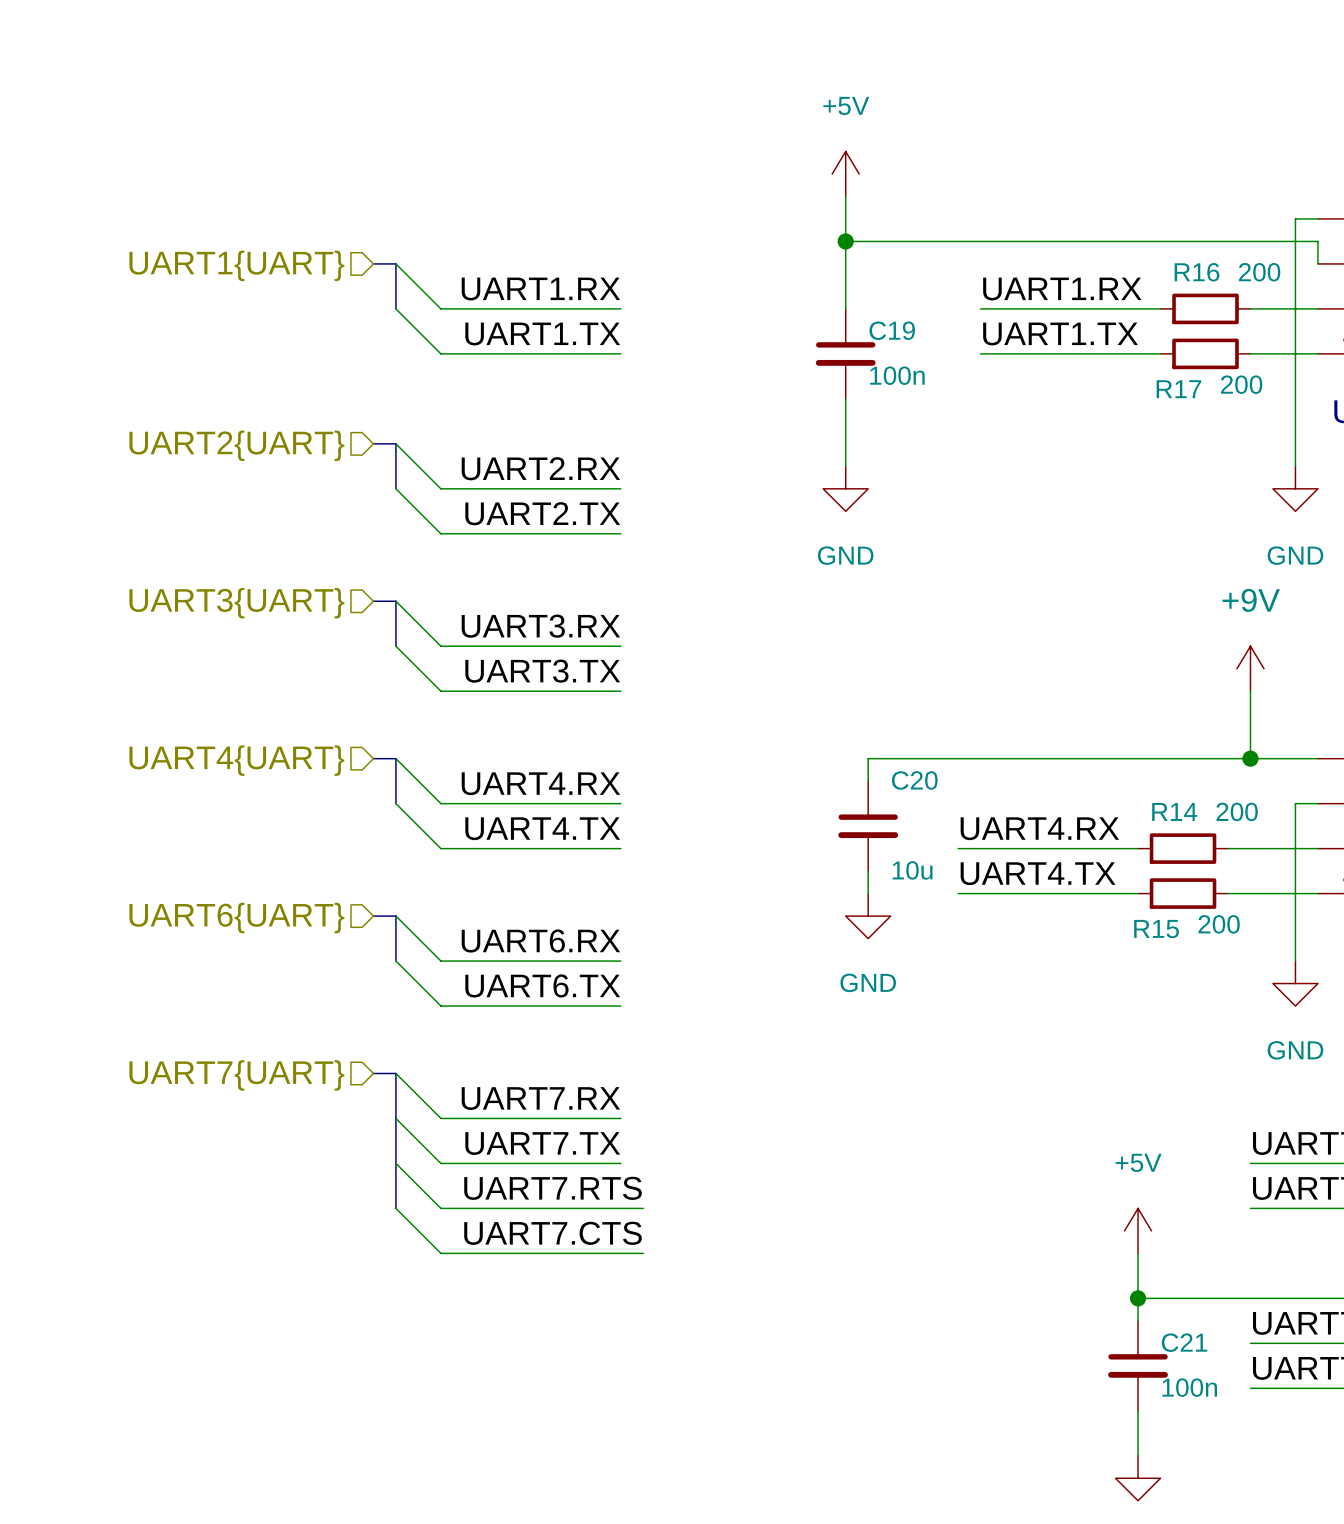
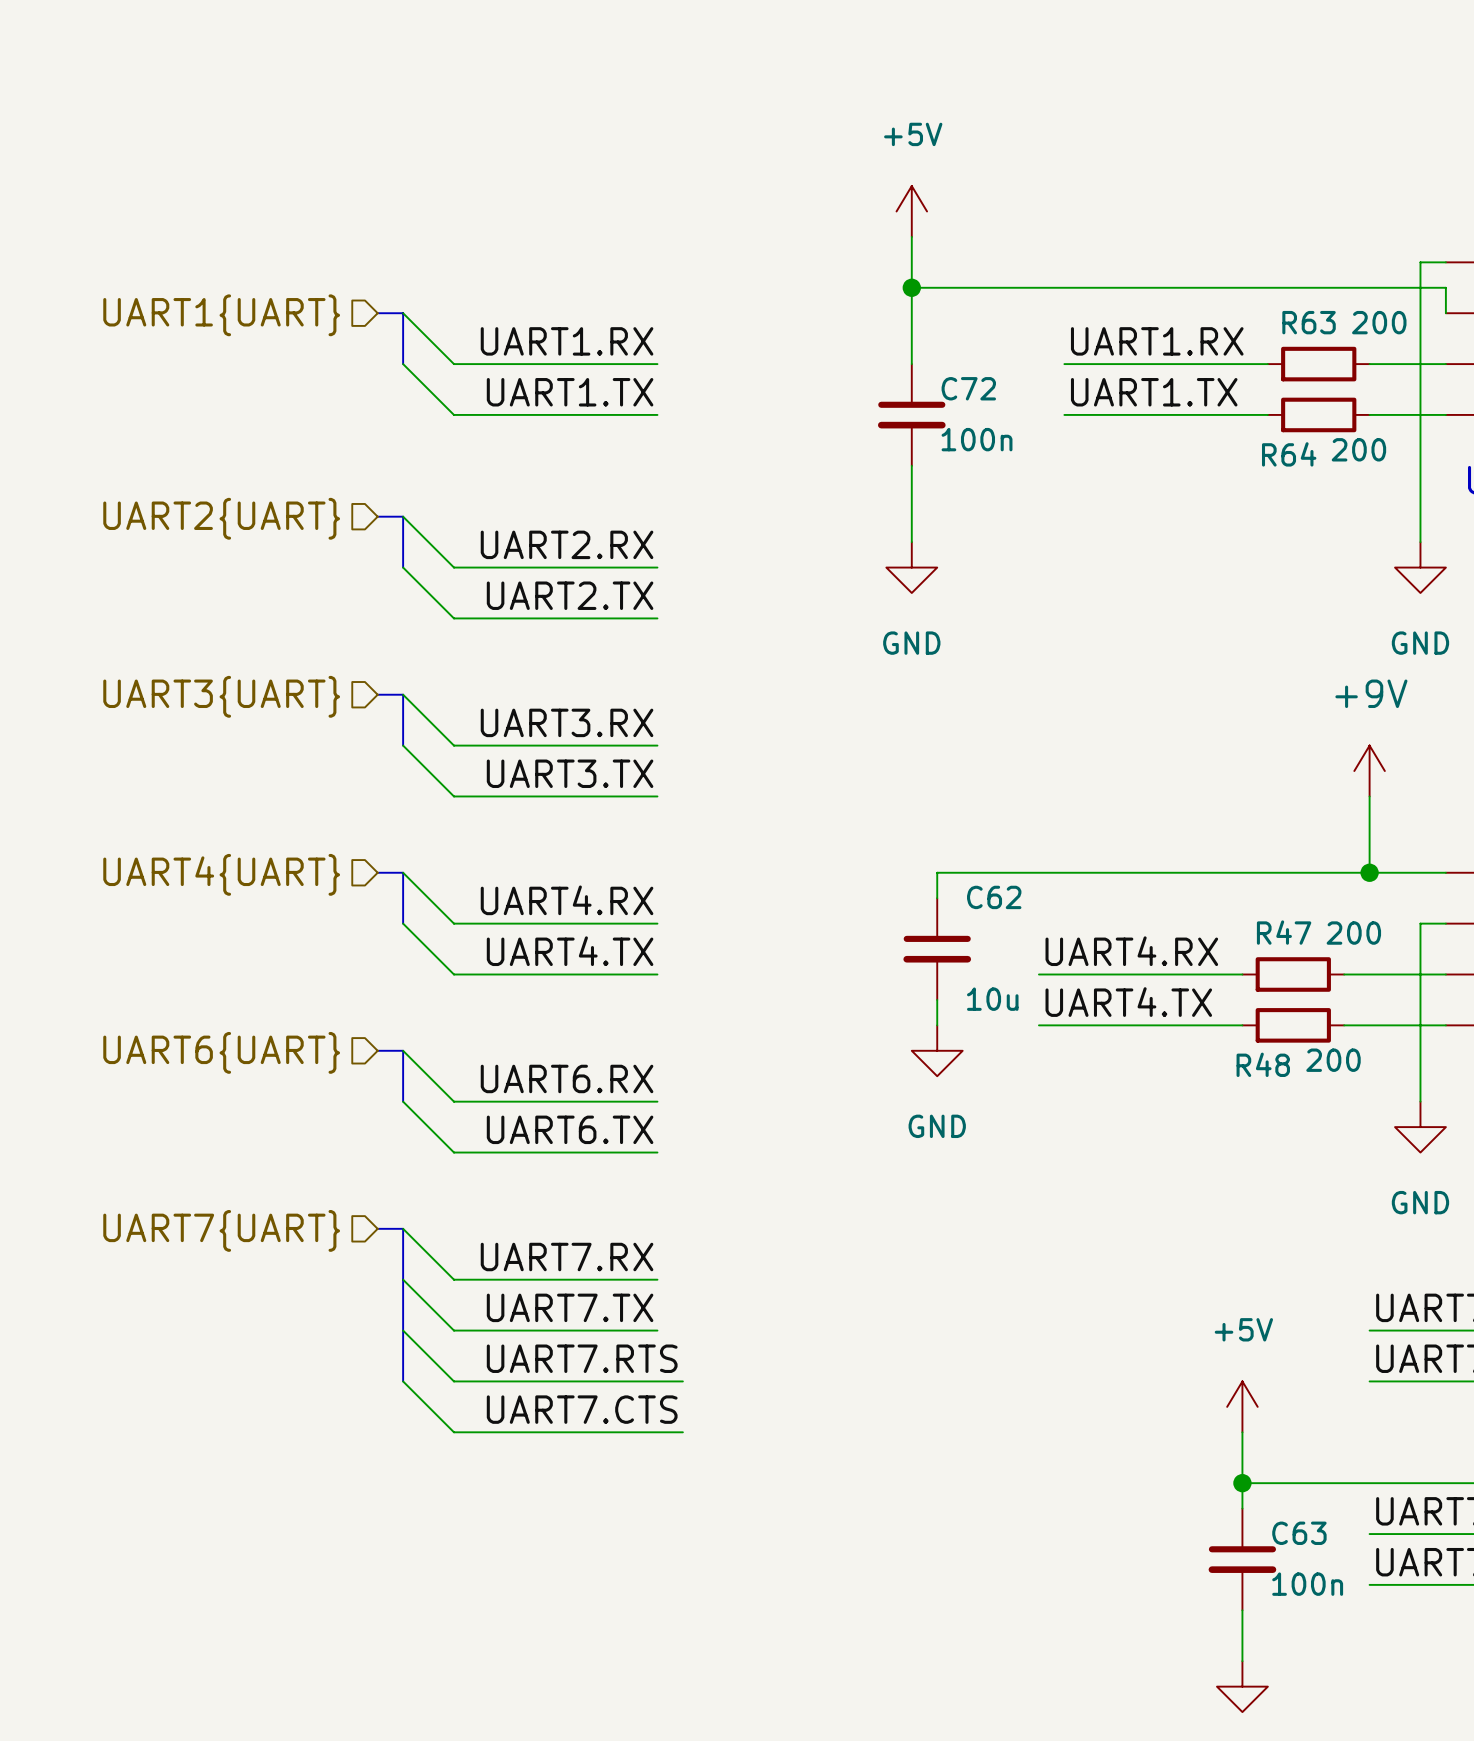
R16 name: R16 (1197, 272) -> R63 (1309, 322)
C19 name: C19 (892, 330) -> C72 (968, 388)
R17 name: R17 (1178, 389) -> R64 (1289, 454)
C20 name: C20 (914, 780) -> C62 (994, 897)
R14 name: R14 (1174, 811) -> R47 (1284, 932)
R15 name: R15 (1156, 929) -> R48 (1263, 1064)
C21 name: C21 (1184, 1342) -> C63 (1299, 1533)

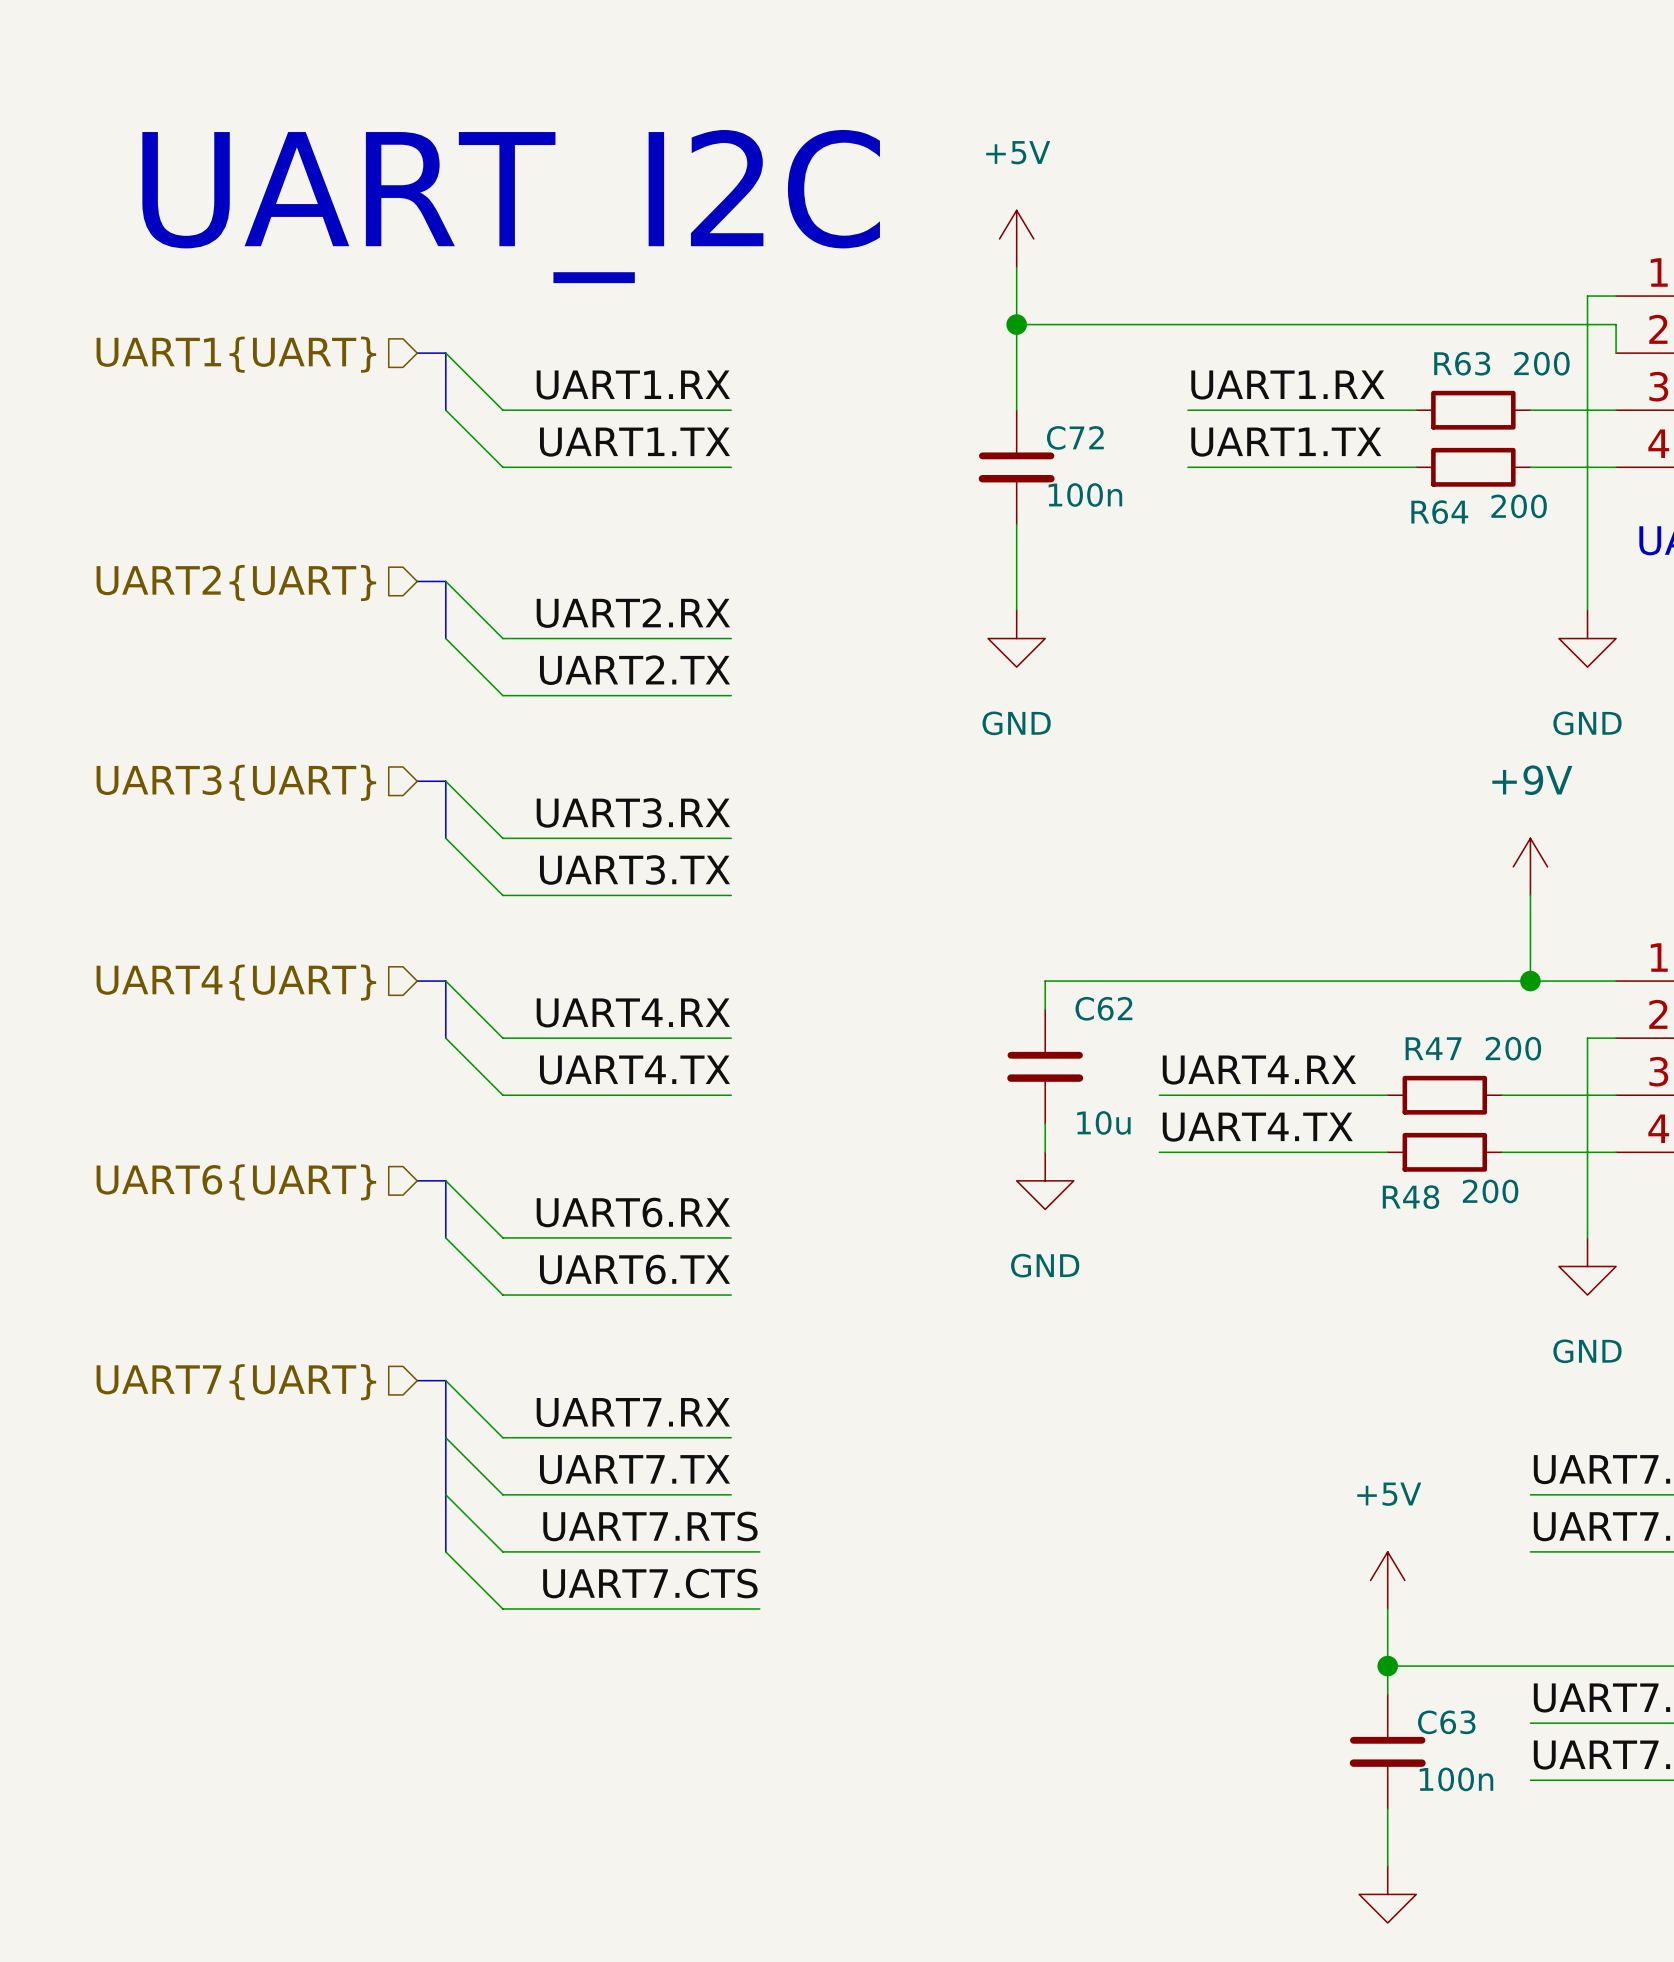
text: none -> UART_I2C (511, 206)

